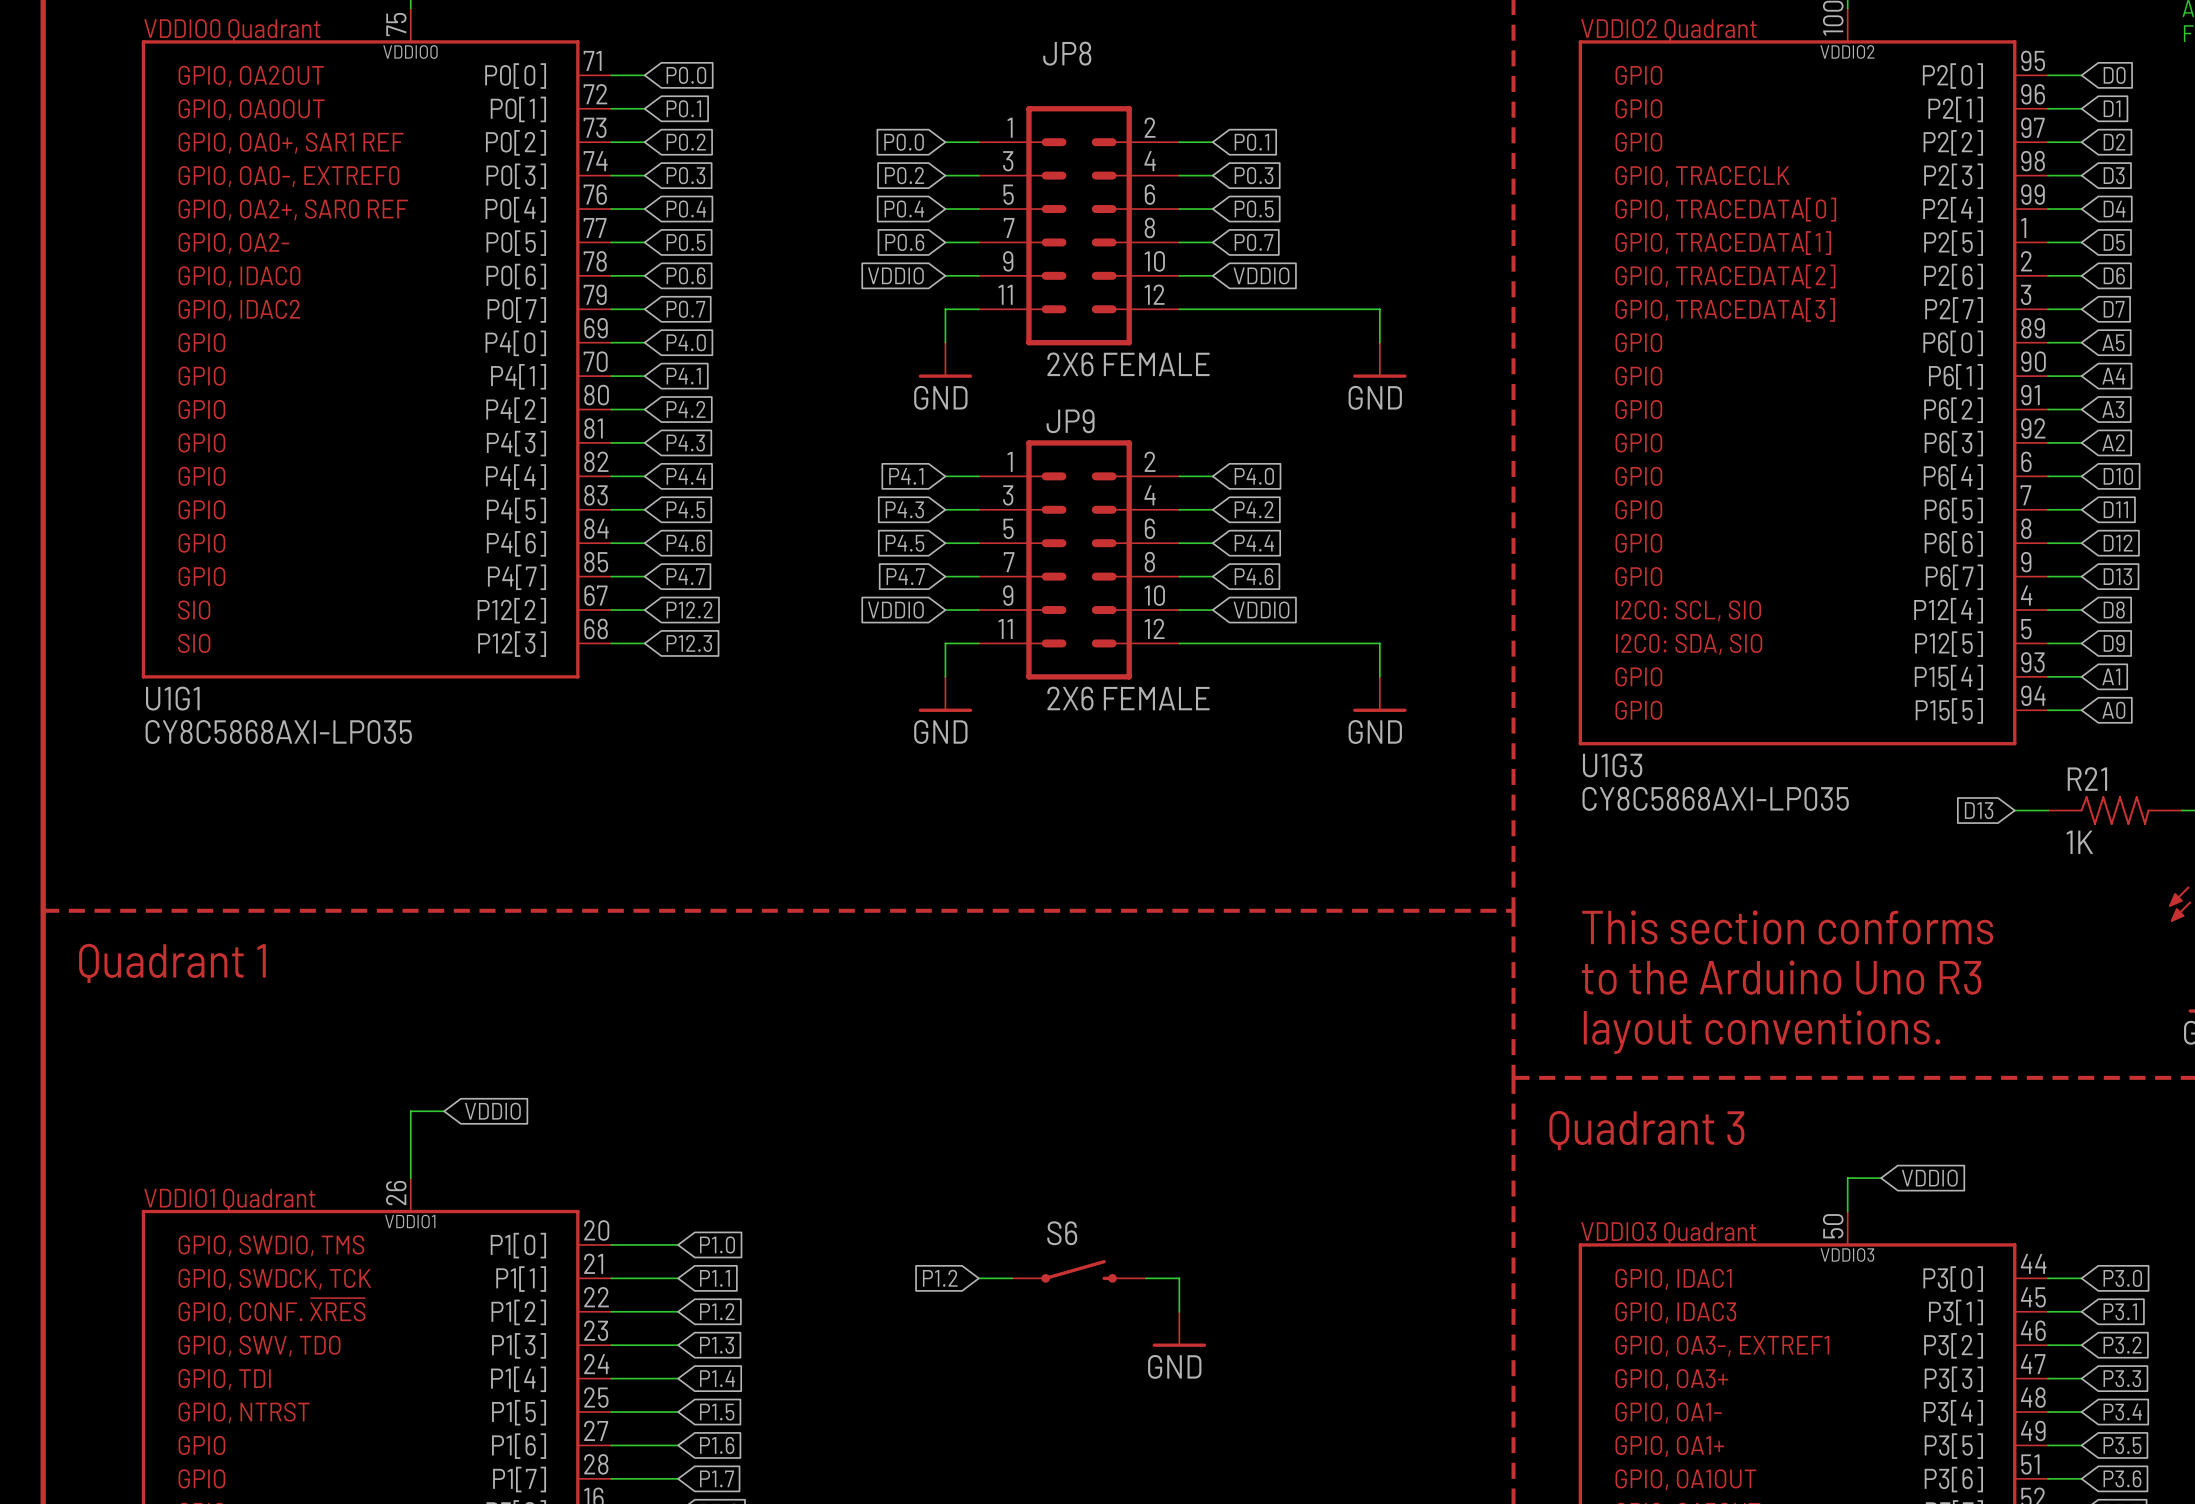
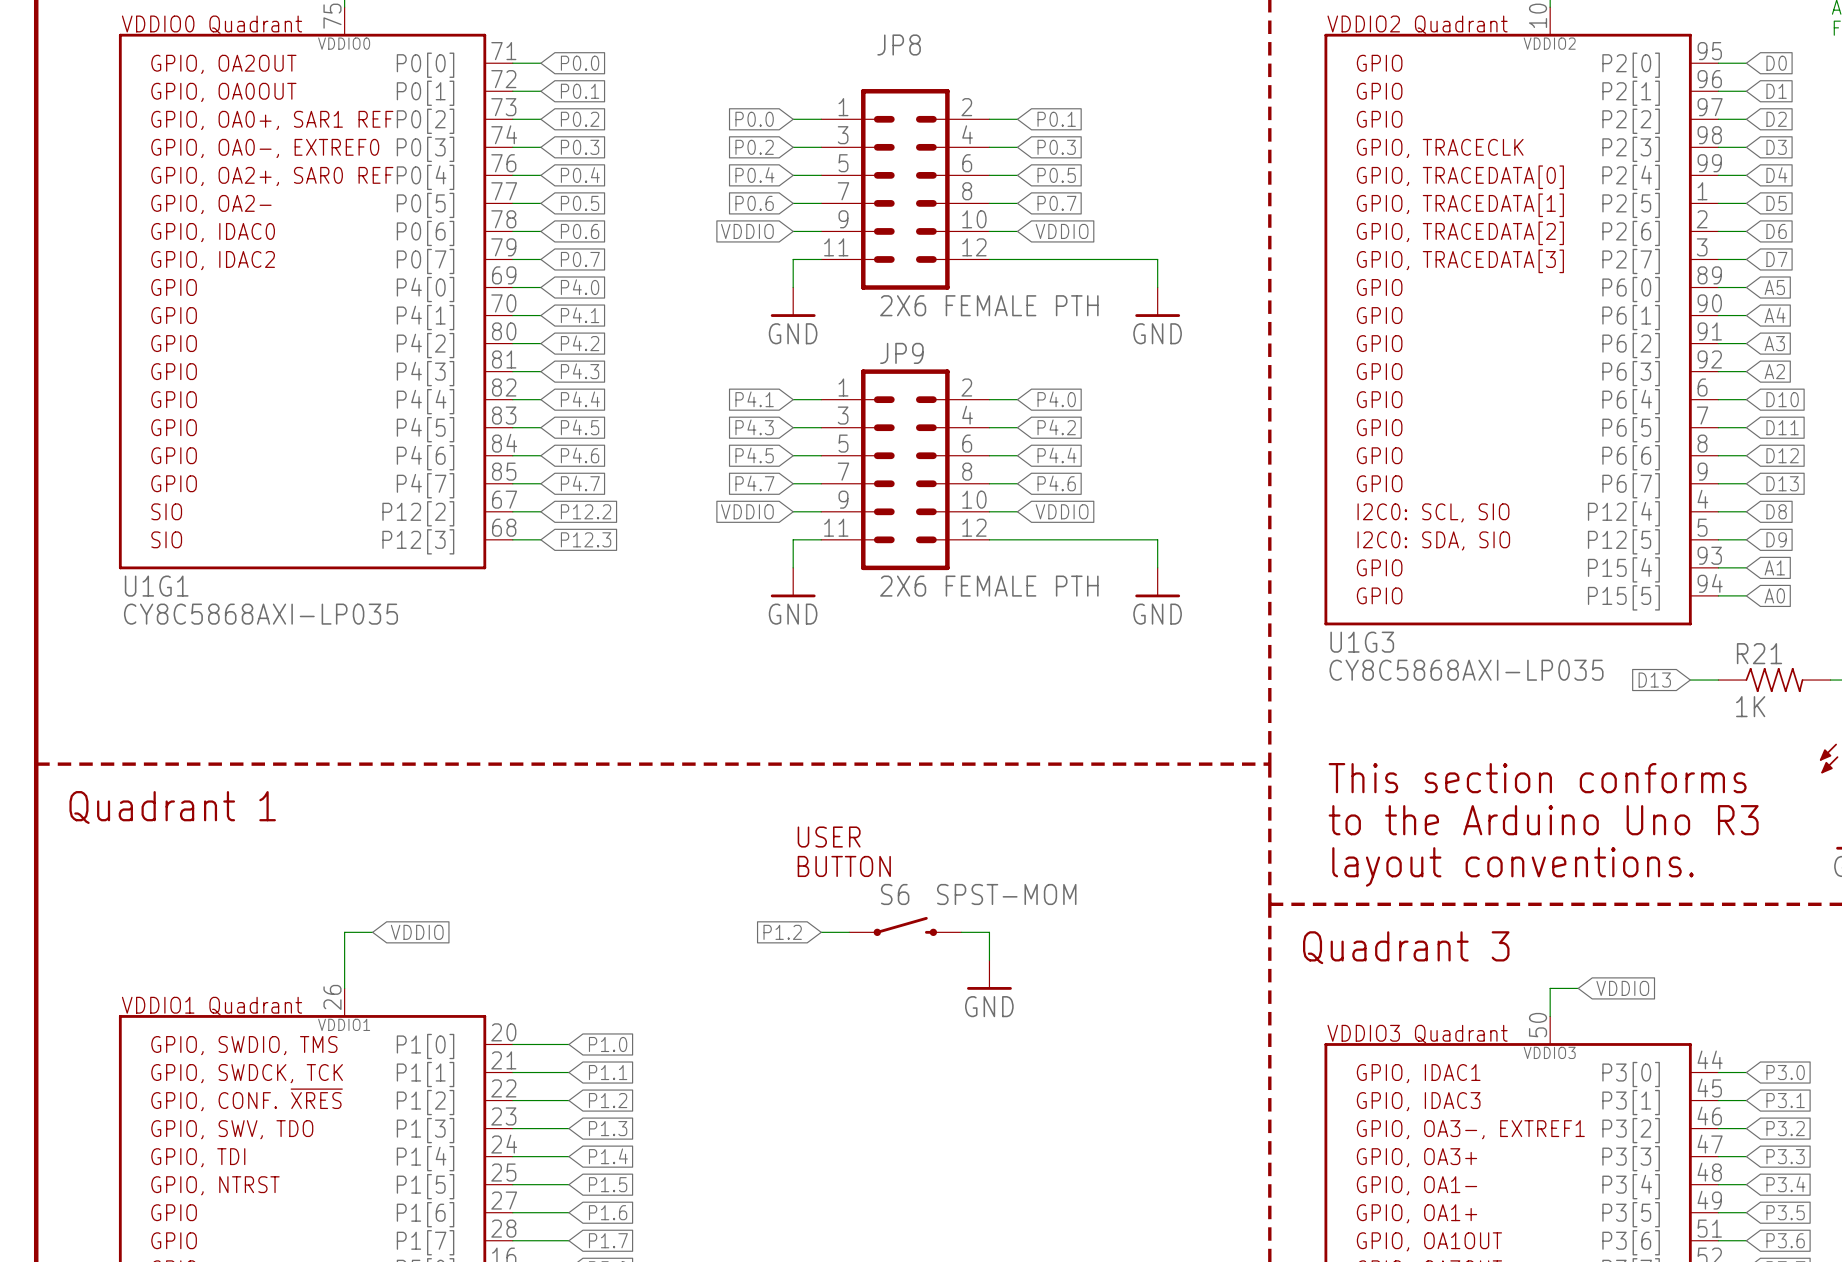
JP8 value: 2X6 FEMALE (1128, 364) -> 2X6 FEMALE PTH (989, 305)
JP9 value: 2X6 FEMALE (1128, 698) -> 2X6 FEMALE PTH (989, 586)
text: none -> USER (829, 837)
text: none -> BUTTON (844, 866)
S6 value: none -> SPST-MOM (1006, 894)
S6 position: (1079, 1271) -> (905, 926)
global label position: P1.2 (940, 1278) -> P1.2 (782, 932)
wire: (978, 1278) (1012, 1278) -> (821, 932) (849, 932)
wire: (1145, 1278) (1179, 1278) (1179, 1311) -> (961, 932) (989, 932) (989, 960)
power symbol position: GND (1179, 1329) -> GND (989, 975)

